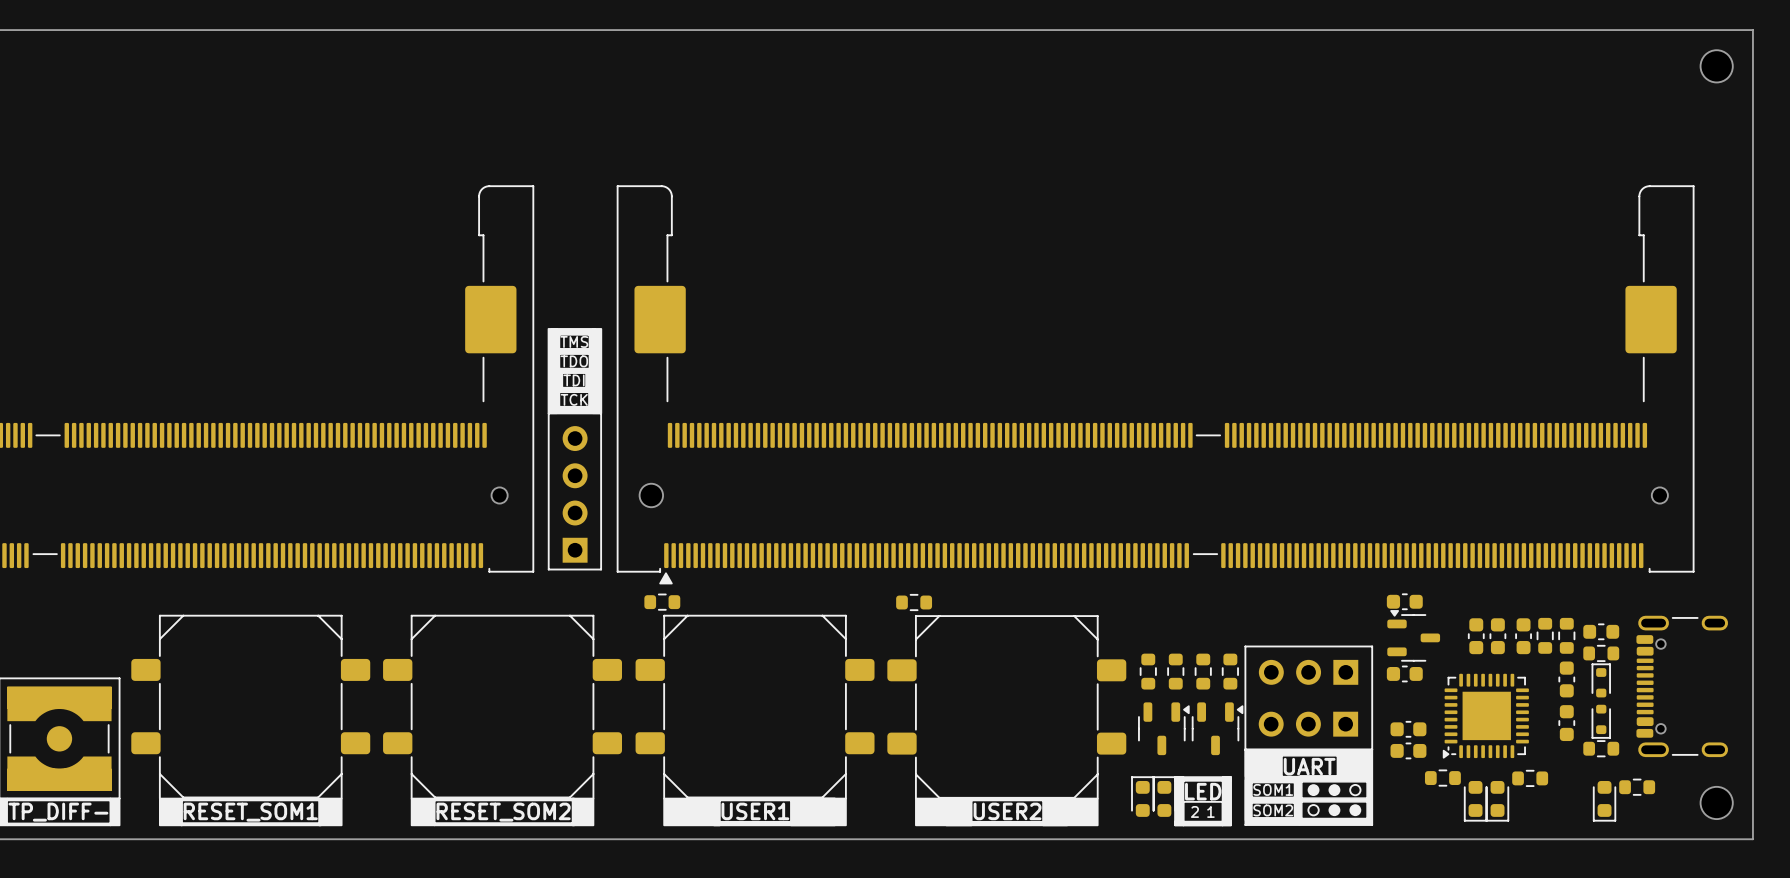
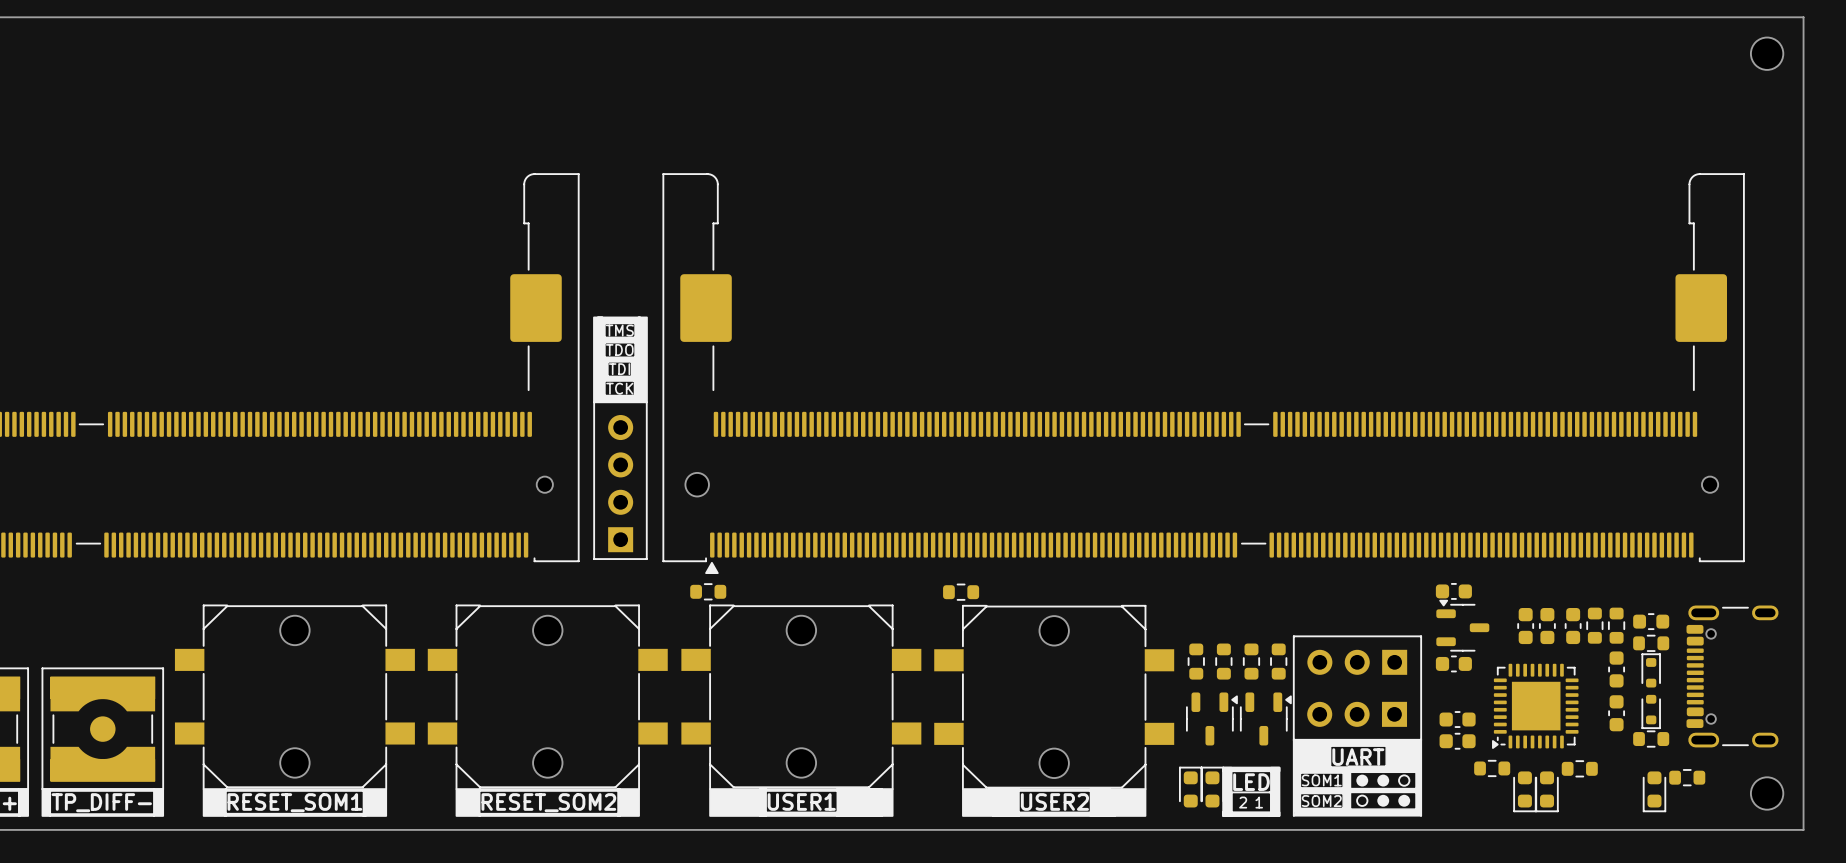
part footprint: [131, 614, 371, 799] -> [174, 605, 415, 789]
part footprint: [383, 614, 623, 799] -> [427, 605, 668, 789]
part footprint: [635, 614, 875, 799] -> [681, 605, 922, 789]
part footprint: [887, 615, 1127, 799] -> [934, 605, 1175, 789]

